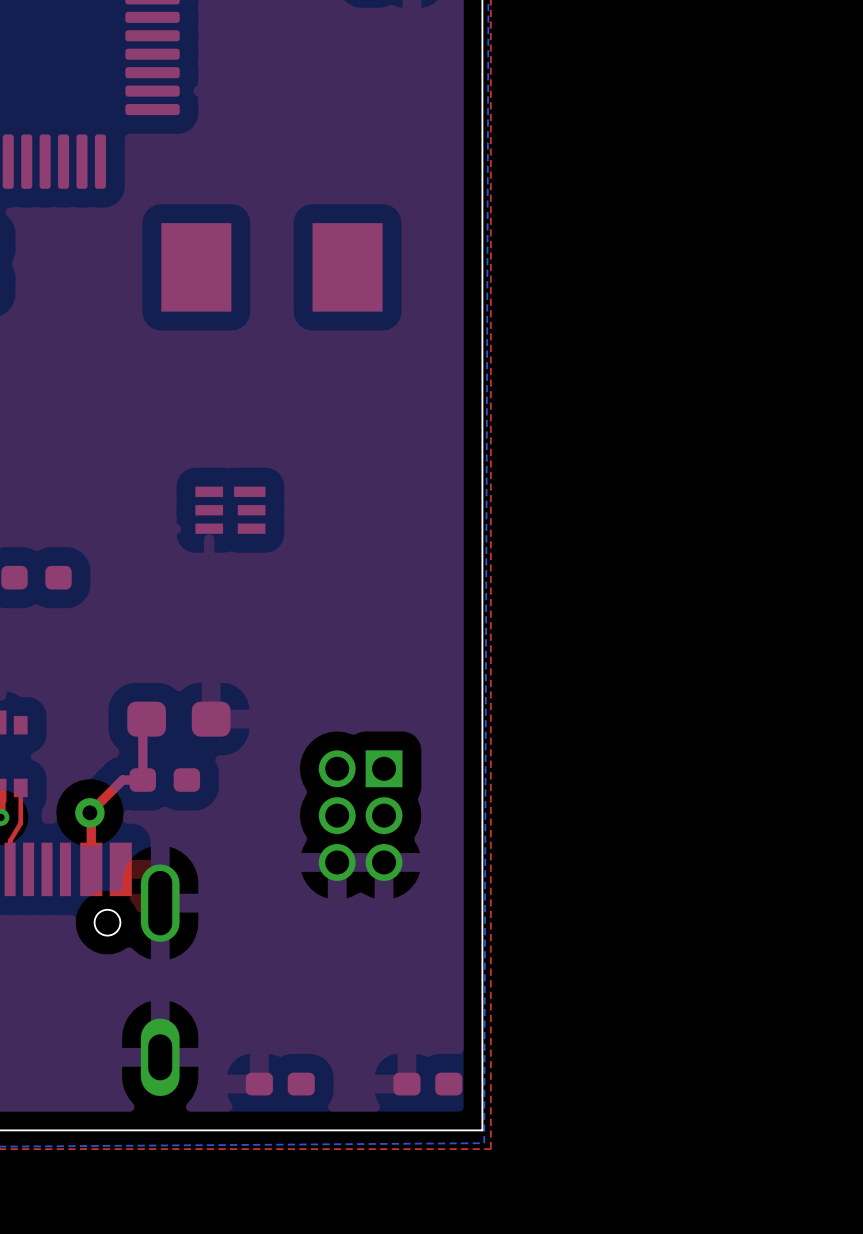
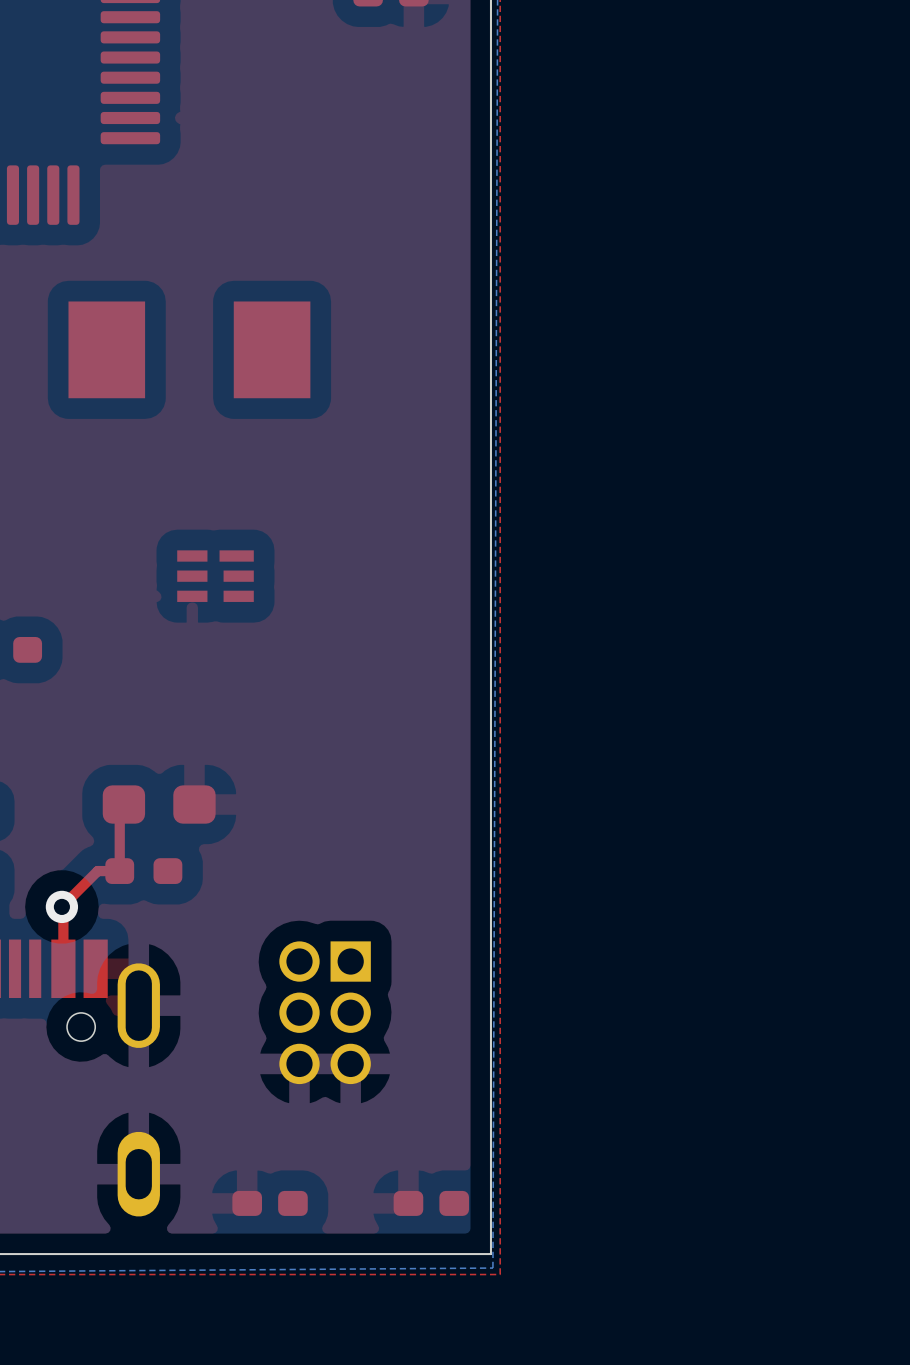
part position: (271, 267) -> (189, 349)
part position: (360, 815) -> (325, 1012)

